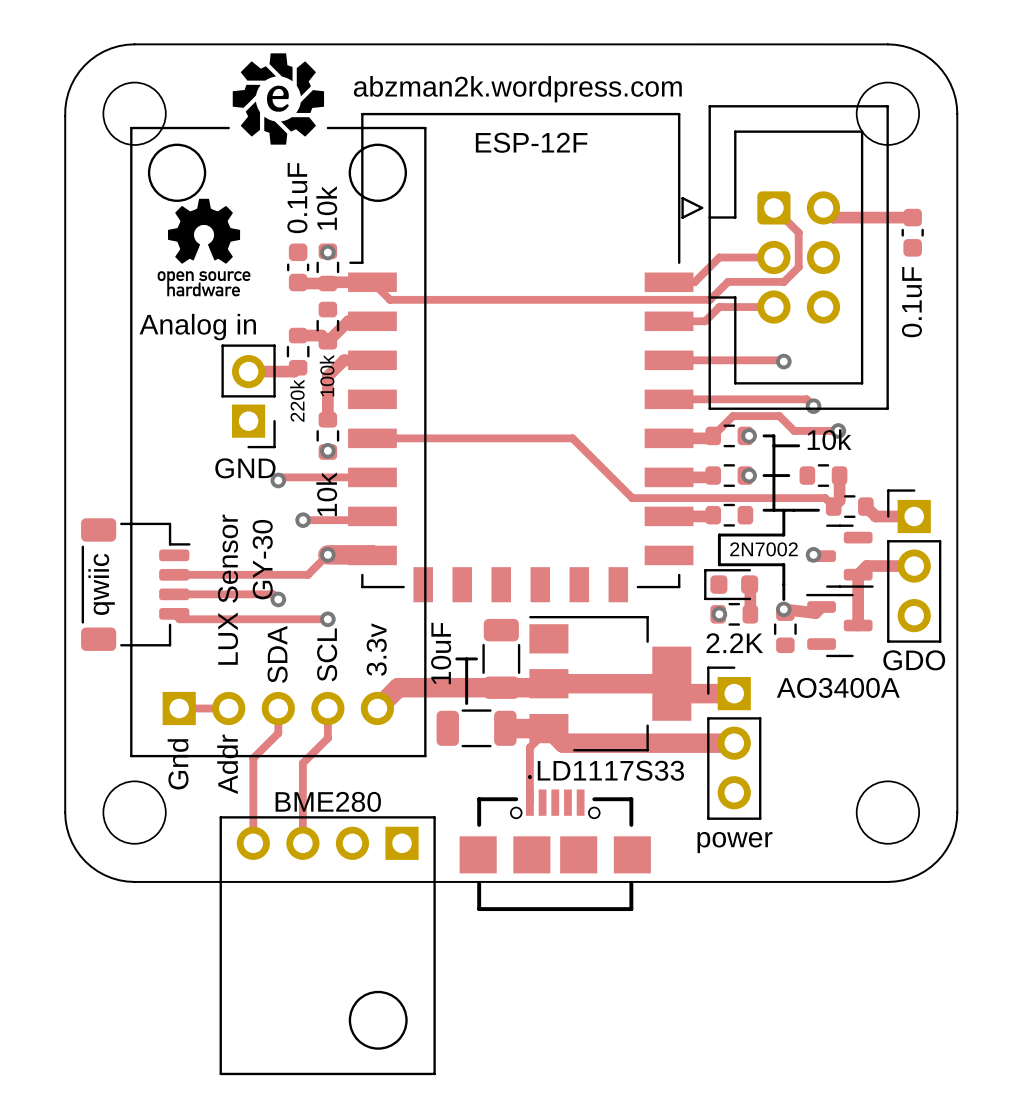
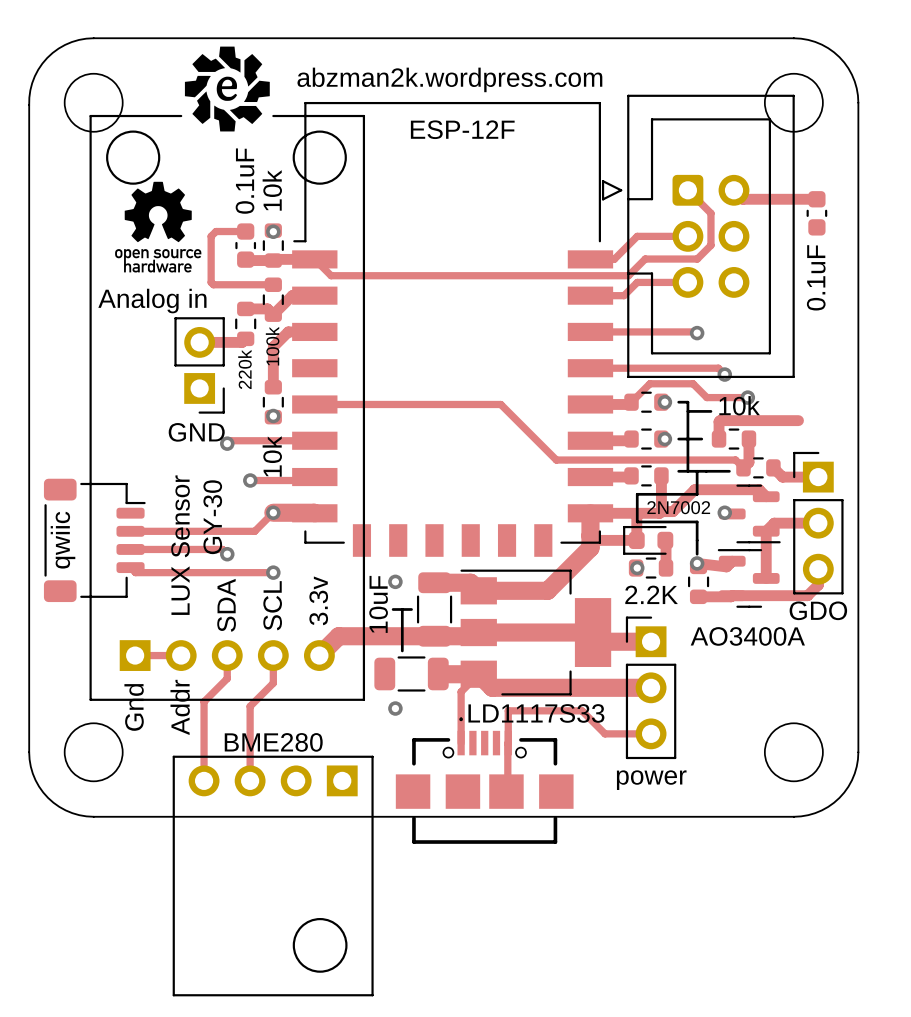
track: none -> (245, 231) (215, 231) (211, 236) (211, 282) (213, 284) (273, 284)
track: none -> (798, 420) (720, 420) (719, 439)
track: none -> (661, 475) (661, 511)
track: none -> (766, 496) (759, 489) (694, 489) (672, 511) (661, 511)
track: none -> (661, 511) (659, 513) (590, 513) (590, 548) (547, 590) (478, 590) (470, 582) (434, 582)
track: none -> (637, 513) (636, 540) (595, 540) (590, 535)
track: none -> (818, 569) (818, 585) (807, 595) (698, 596)
via: none -> (395, 581)
via: none -> (395, 708)
track: none -> (651, 733) (605, 733) (581, 710) (508, 710) (506, 791)

